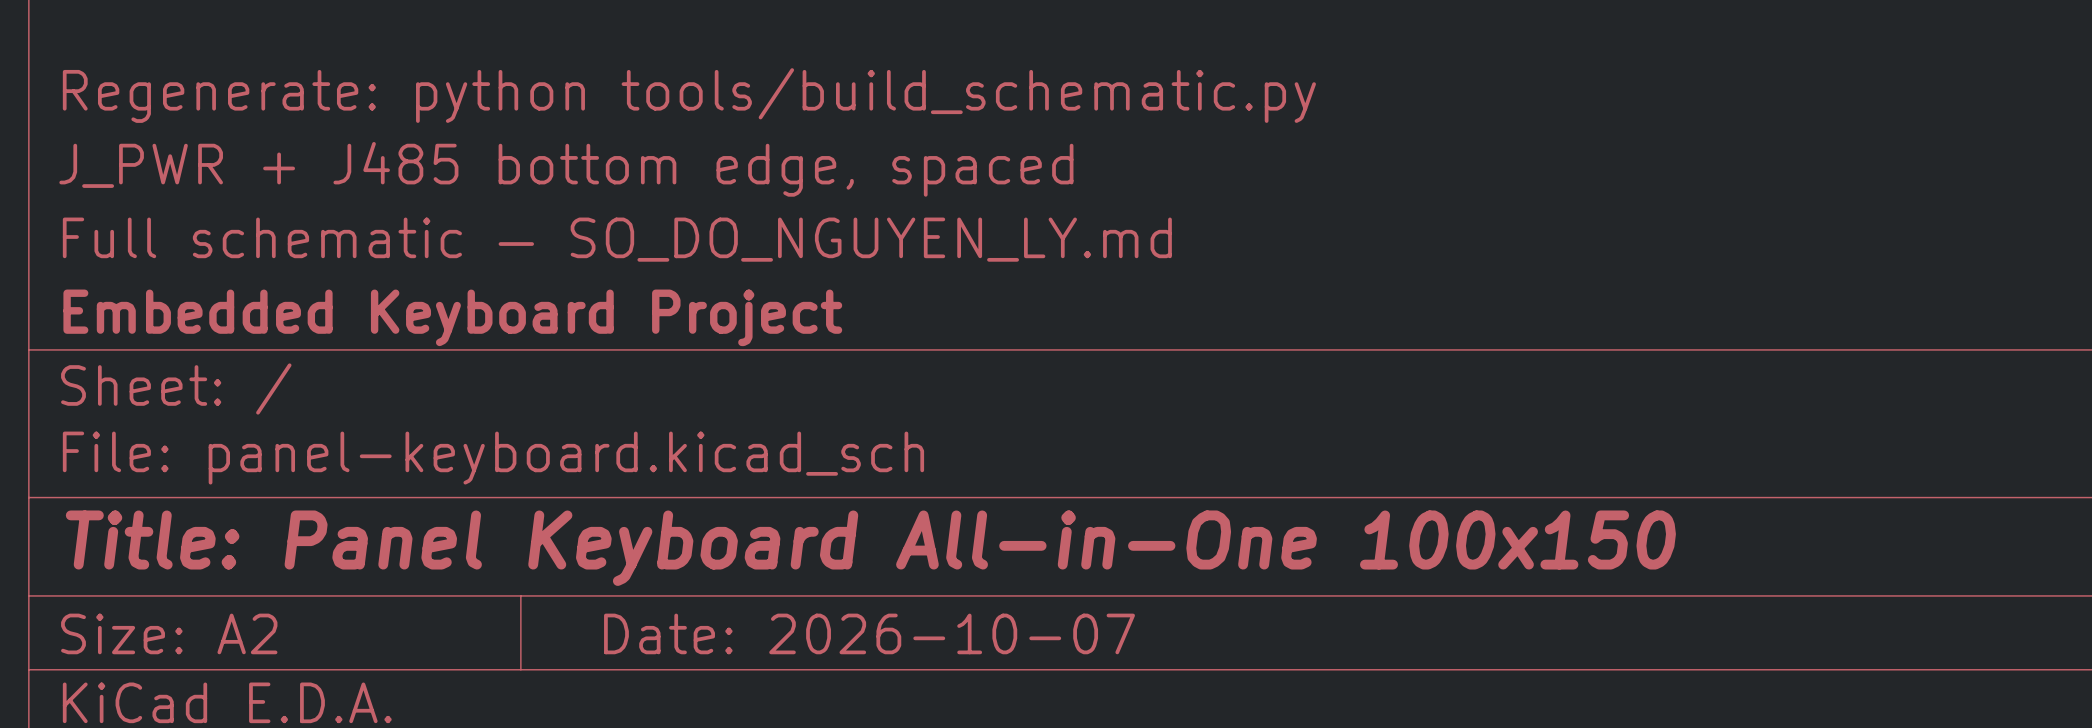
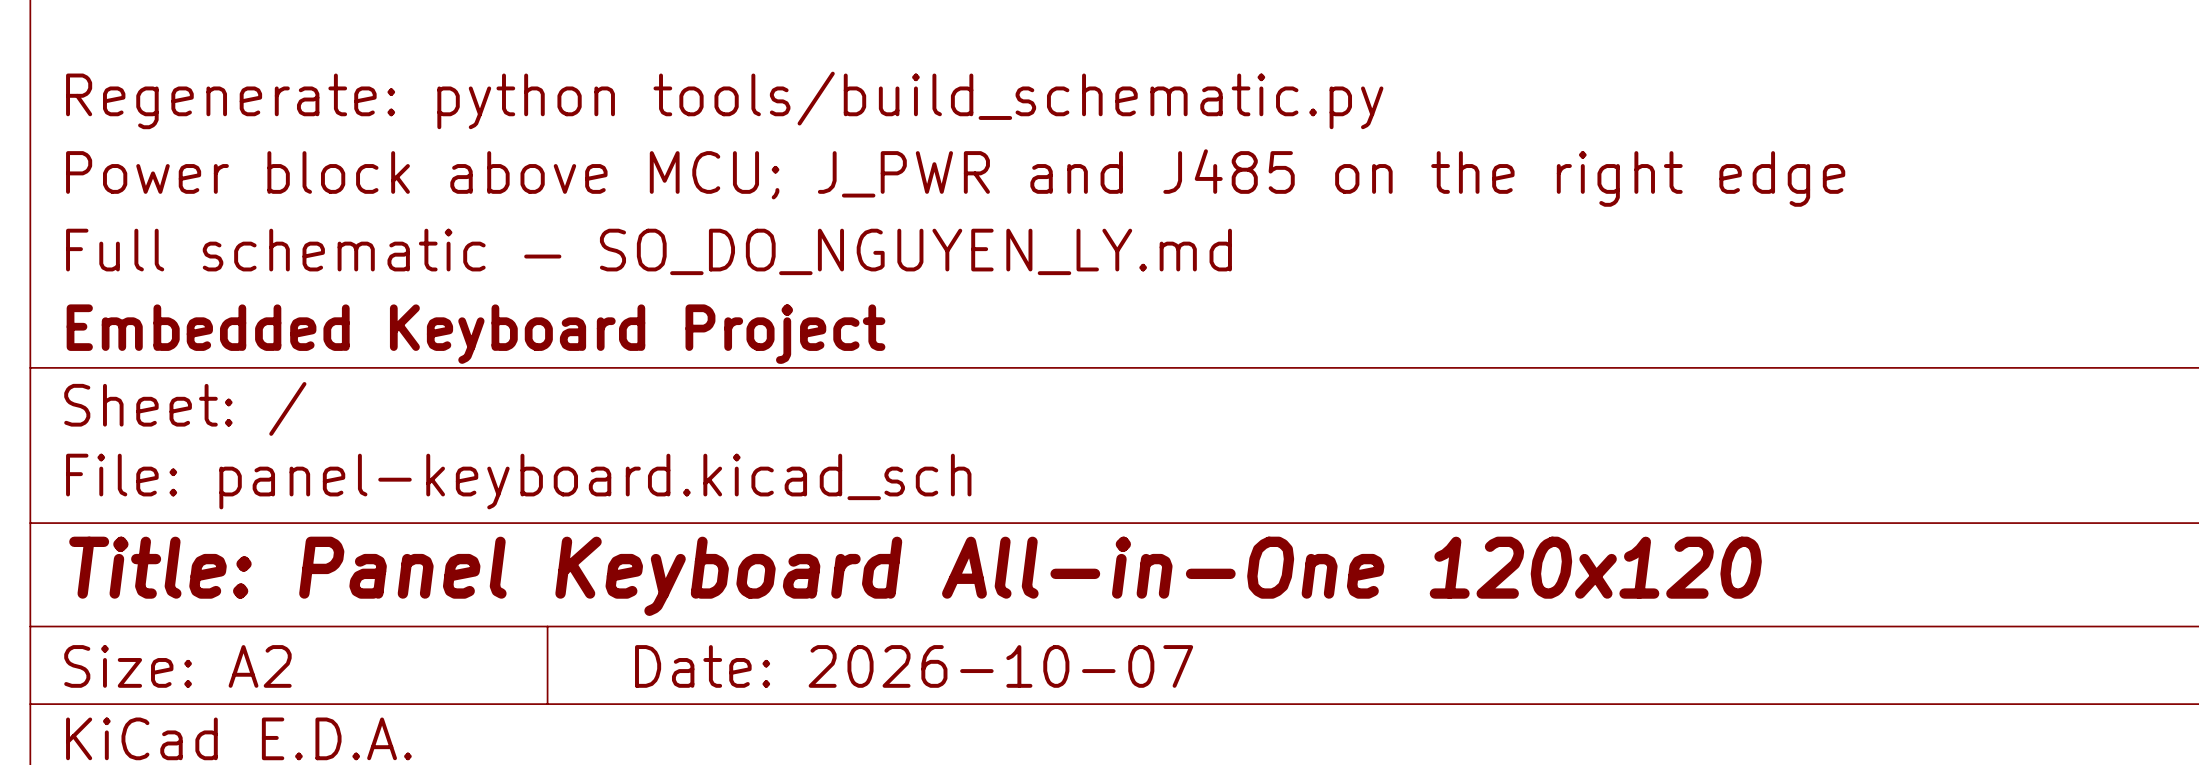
title block: J_PWR + J485 bottom edge, spaced (566, 169) -> Power block above MCU; J_PWR and J485 on the right edge (955, 178)
title block: Title: Panel Keyboard All-in-One 100x150 (870, 548) -> Title: Panel Keyboard All-in-One 120x120 (915, 576)

